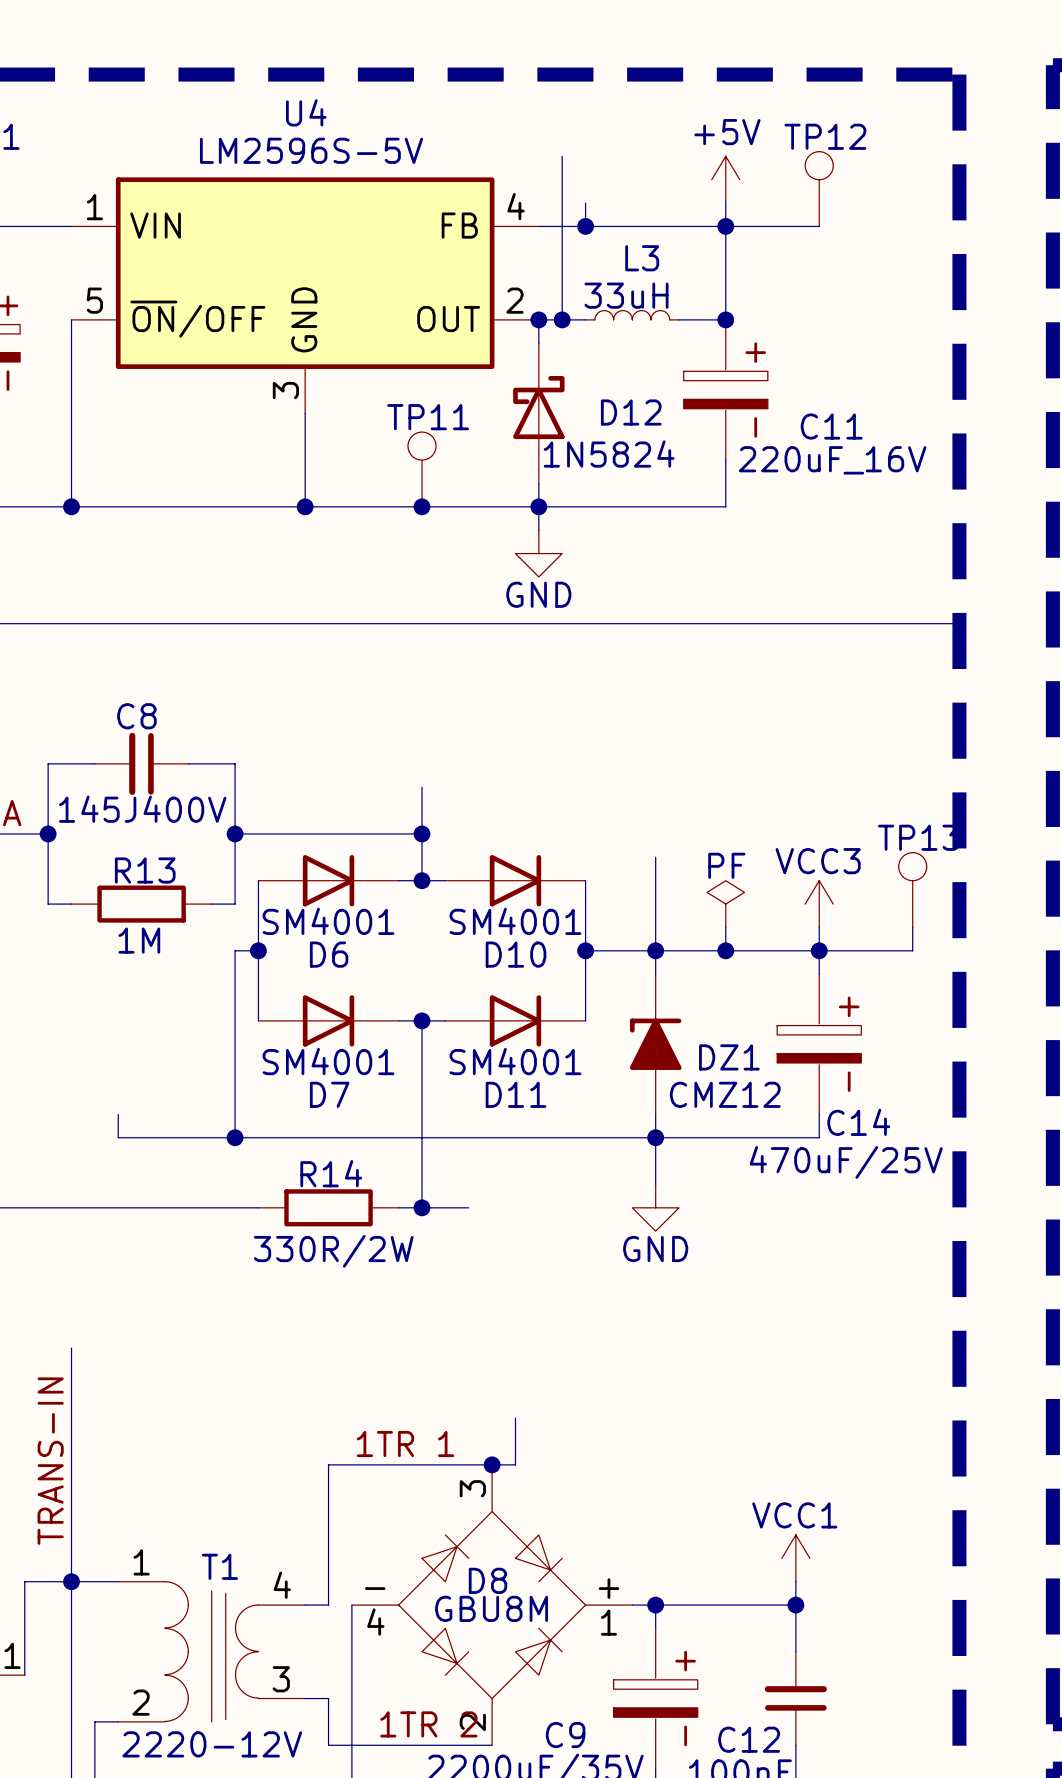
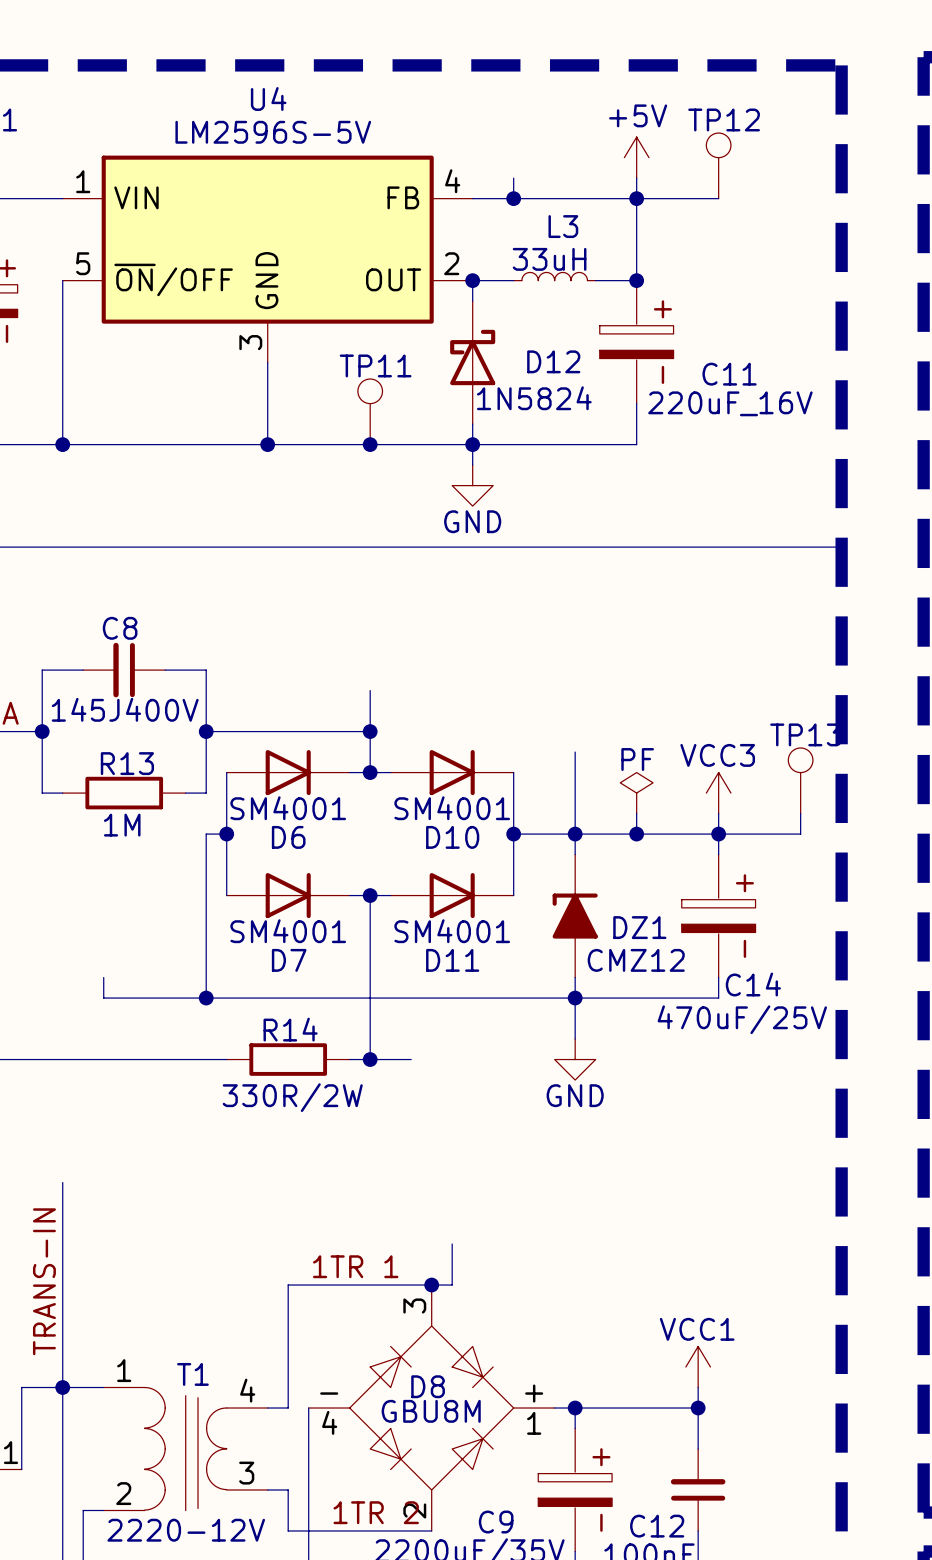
wire: (562, 156) (562, 319) -> none
junction: (562, 319) -> none

